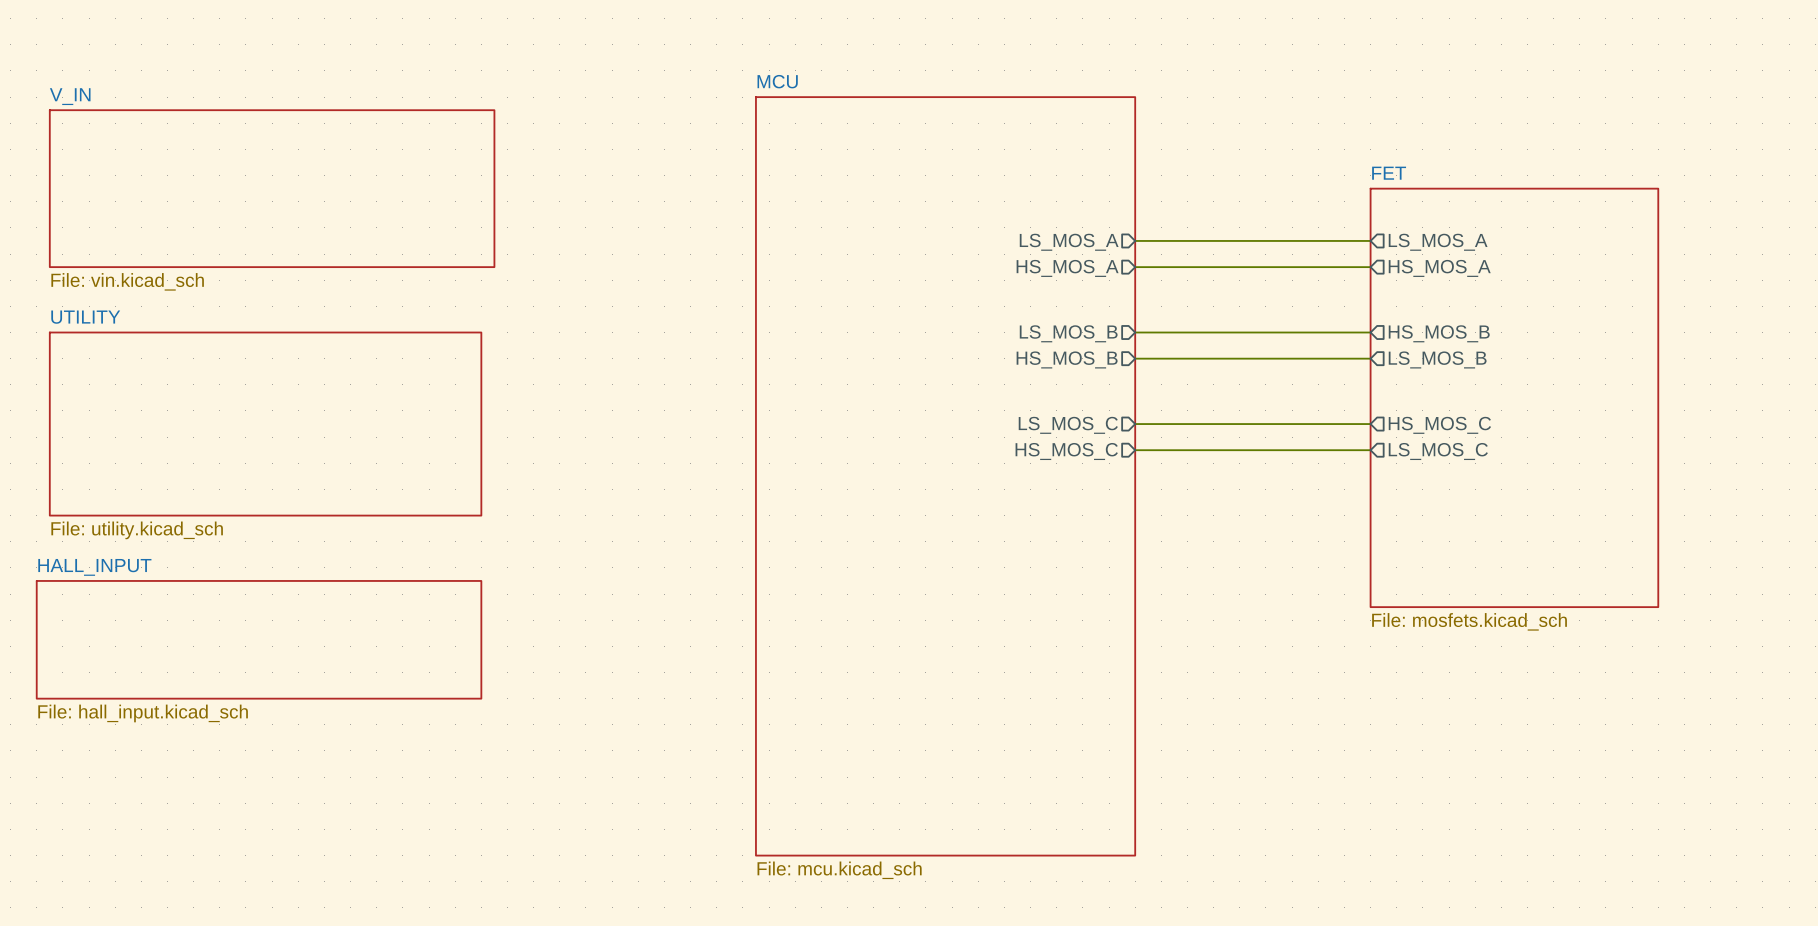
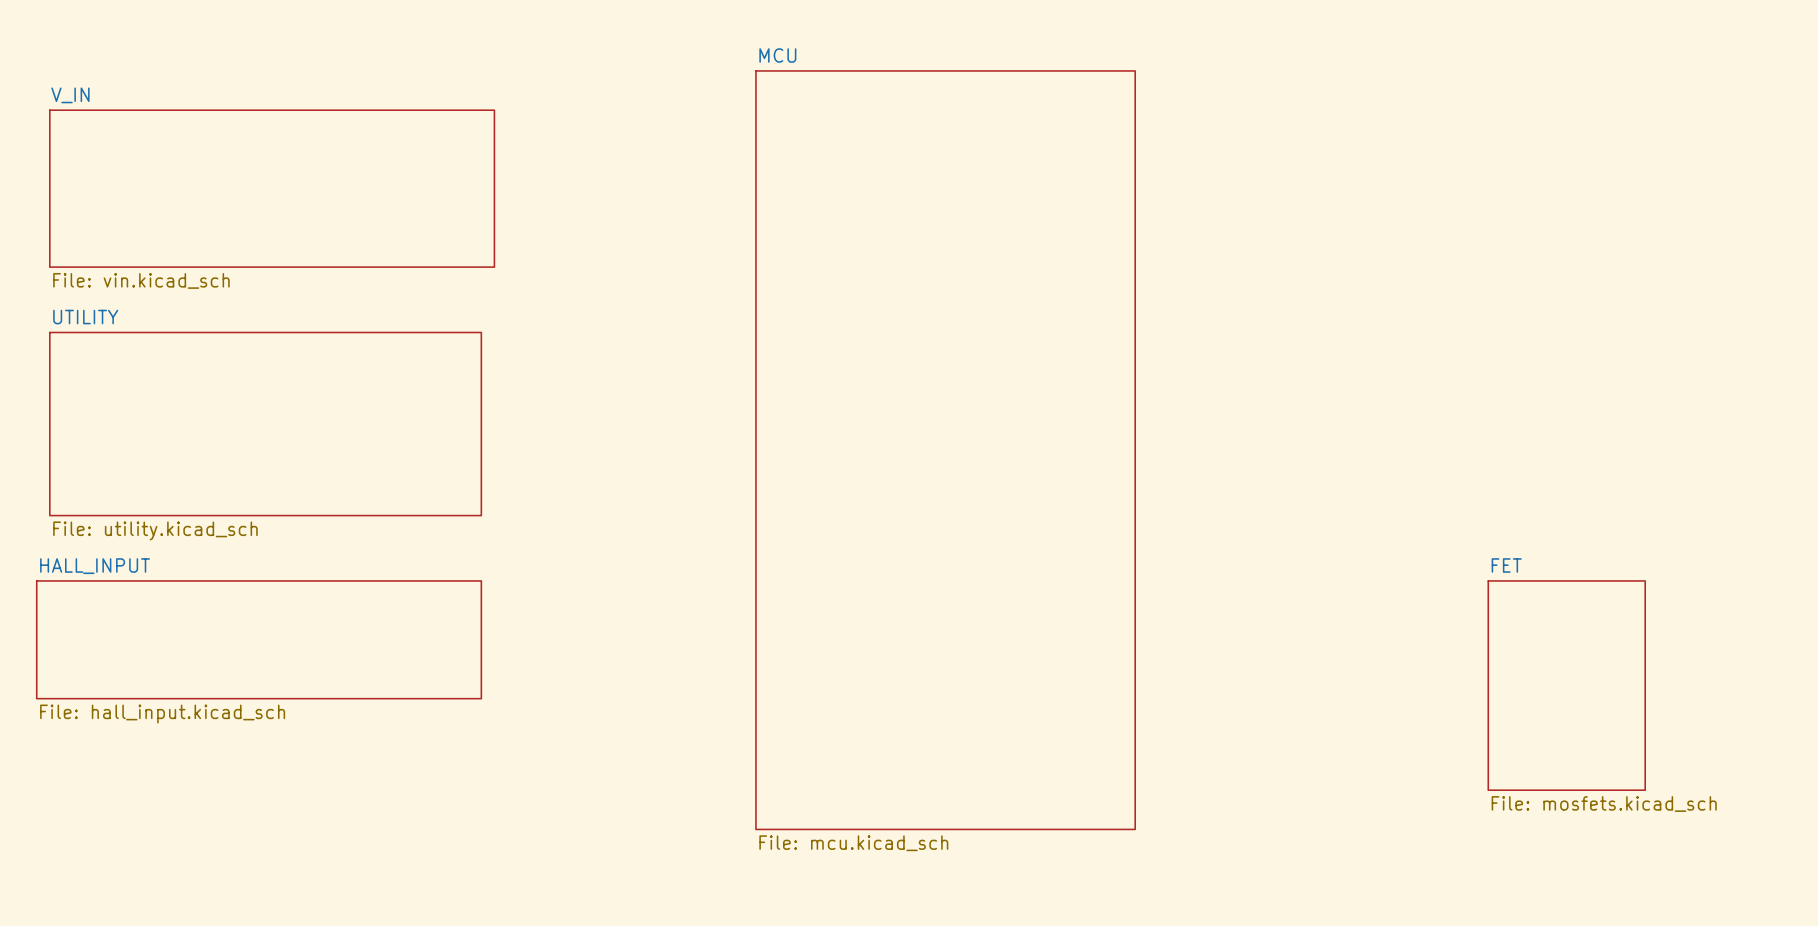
wire: (1135, 240) (1370, 240) -> none
sheet pin: LS_MOS_A (1069, 242) -> none
sheet pin: LS_MOS_A (1438, 242) -> none
wire: (1135, 267) (1370, 267) -> none
sheet pin: HS_MOS_A (1067, 268) -> none
sheet pin: HS_MOS_A (1439, 268) -> none
wire: (1135, 332) (1370, 332) -> none
sheet pin: LS_MOS_B (1068, 333) -> none
sheet pin: HS_MOS_B (1439, 333) -> none
wire: (1135, 358) (1370, 358) -> none
sheet pin: HS_MOS_B (1067, 359) -> none
sheet pin: LS_MOS_B (1437, 359) -> none
sheet FET: File: mosfets.kicad_sch (1514, 397) -> none
wire: (1135, 424) (1370, 424) -> none
sheet pin: LS_MOS_C (1068, 425) -> none
sheet pin: HS_MOS_C (1439, 425) -> none
wire: (1135, 450) (1370, 450) -> none
sheet pin: HS_MOS_C (1066, 451) -> none
sheet pin: LS_MOS_C (1438, 451) -> none
sheet MCU position: (945, 476) -> (945, 450)
sheet FET: none -> File: mosfets.kicad_sch (1566, 685)

